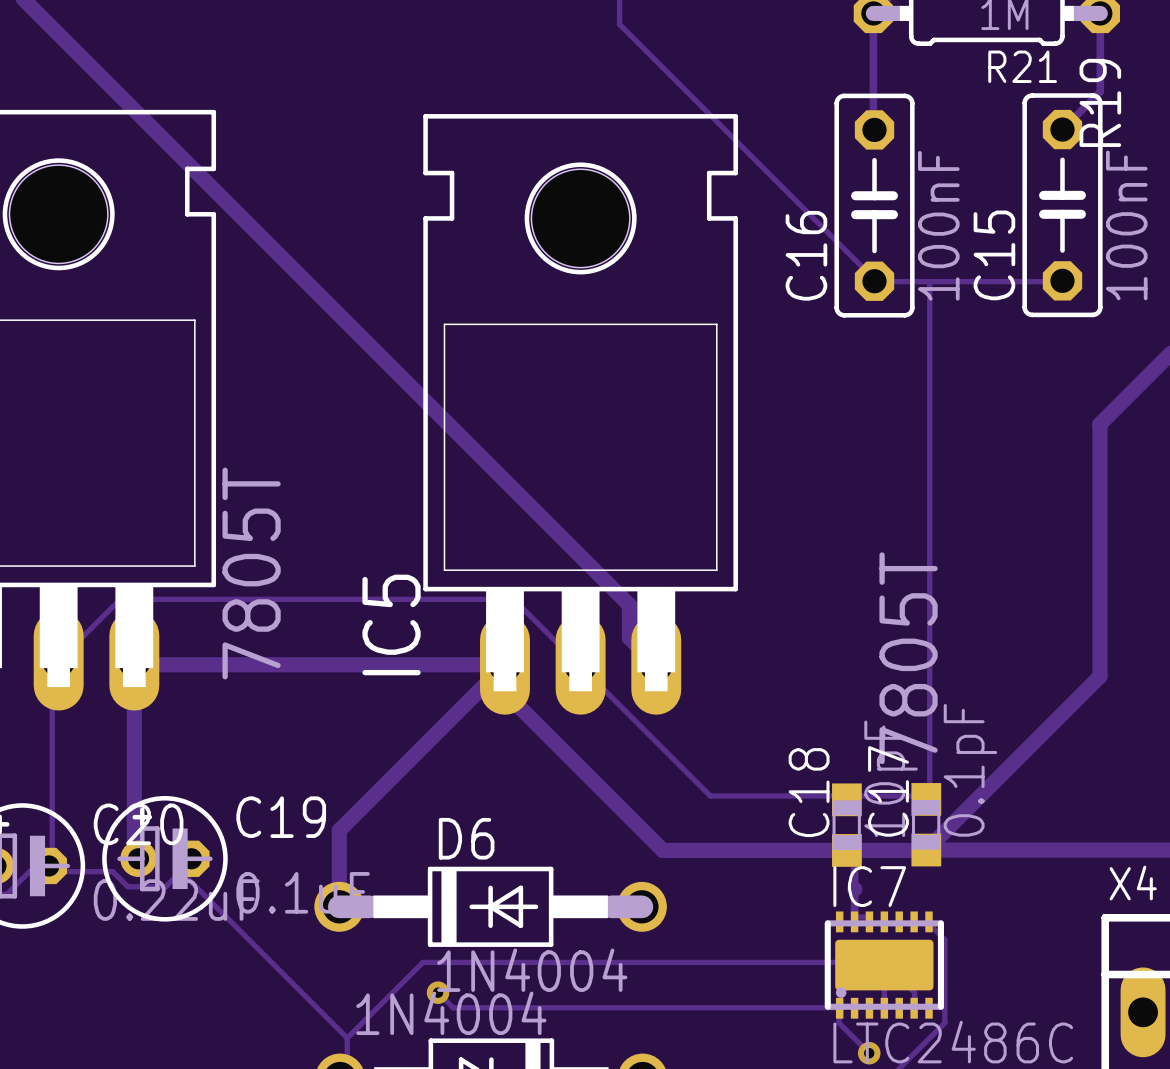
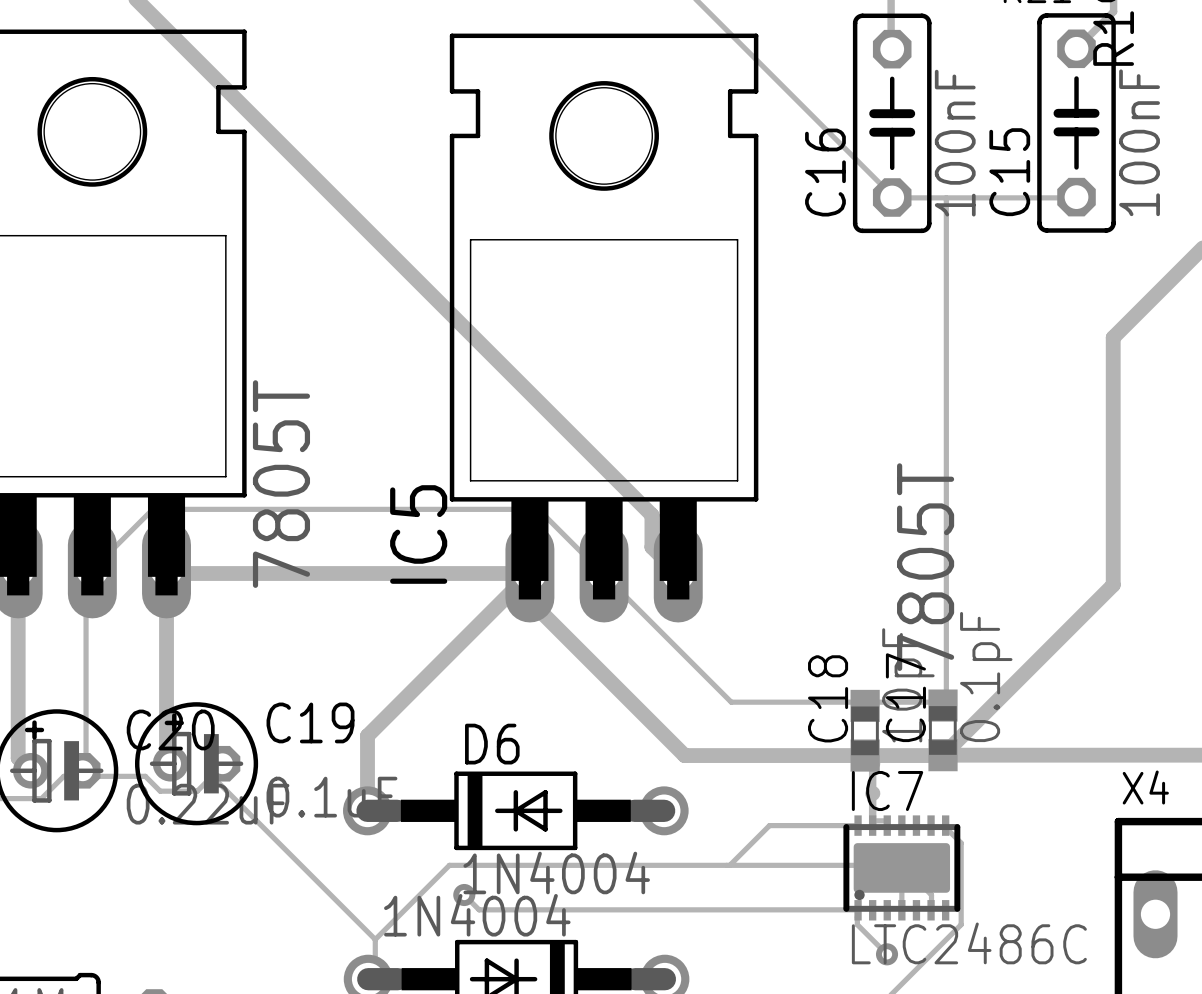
track: none -> (858, 825) (769, 825) (729, 865)

